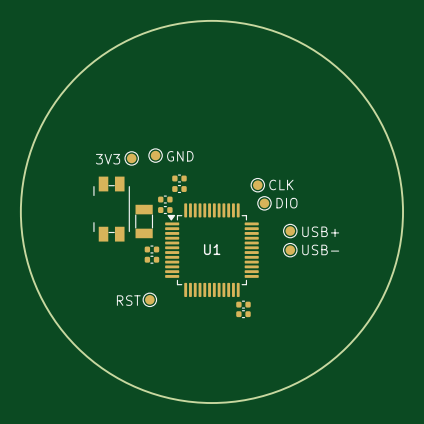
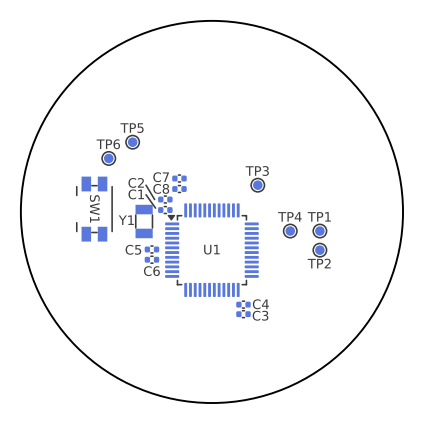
TP5: none -> (132, 142)
part: (155, 155) -> none
text: GND (180, 156) -> none
TP6: none -> (108, 158)
part: (131, 158) -> none
text: 3V3 (108, 159) -> none
TP3 name: none -> TP3 (257, 171)
C7 name: none -> C7 (161, 177)
C2 name: none -> C2 (136, 182)
text: CLK (281, 184) -> none
line: none -> (146, 185) (154, 199)
C8 name: none -> C8 (161, 188)
C1 name: none -> C1 (136, 194)
line: none -> (146, 194) (155, 208)
part: (264, 203) -> none
text: DIO (286, 203) -> none
SW1: none -> (94, 209)
part: (111, 209) -> none
TP4 name: none -> TP4 (289, 216)
Y1 name: none -> Y1 (126, 220)
TP1: none -> (319, 231)
text: USB+ (320, 231) -> none
C5 name: none -> C5 (133, 249)
text: USB- (320, 249) -> none
part: (290, 250) -> none
TP2: none -> (319, 250)
C6 name: none -> C6 (151, 271)
part: (149, 299) -> none
text: RST (128, 300) -> none
C4 name: none -> C4 (260, 304)
C3 name: none -> C3 (260, 315)

